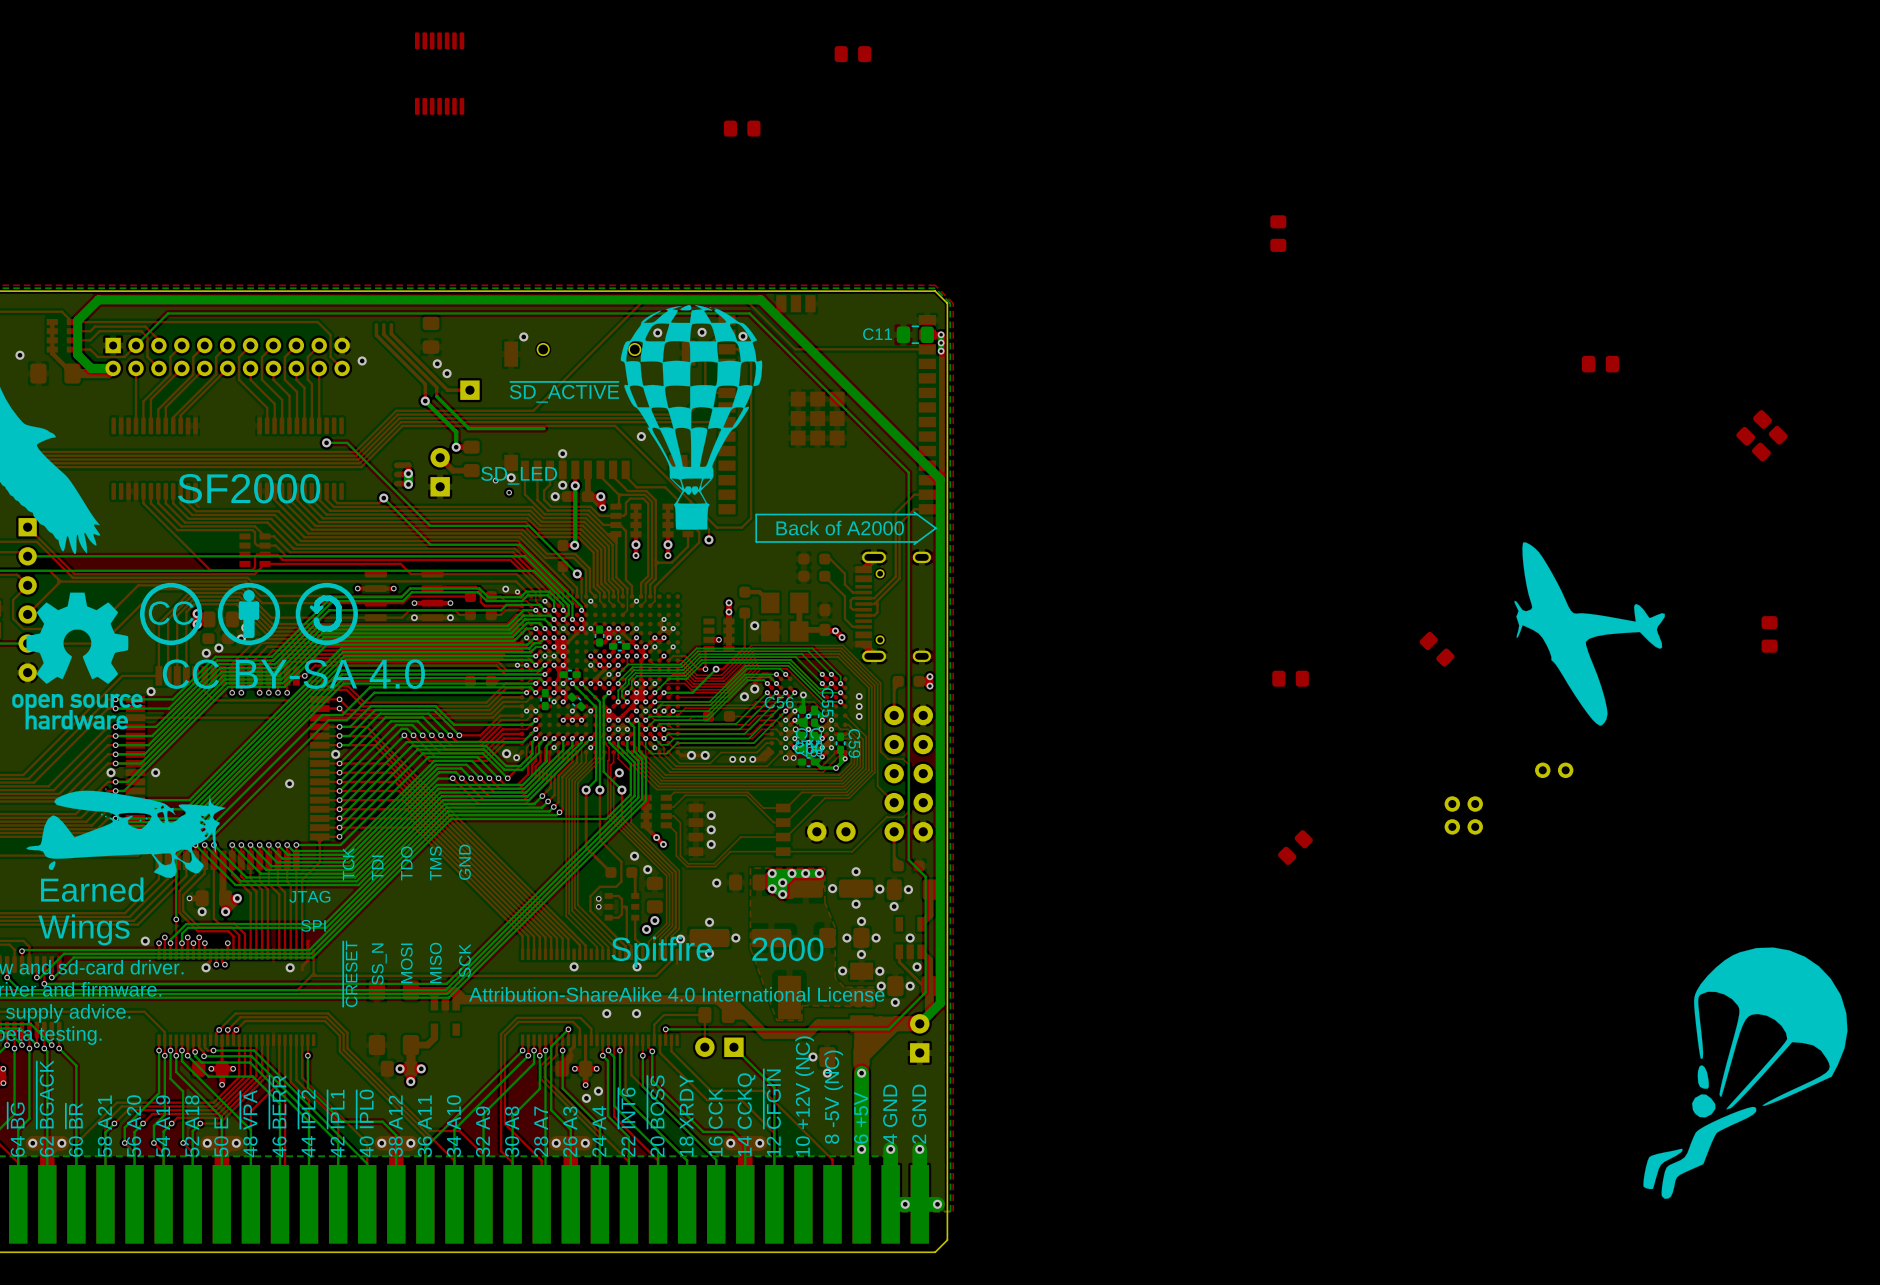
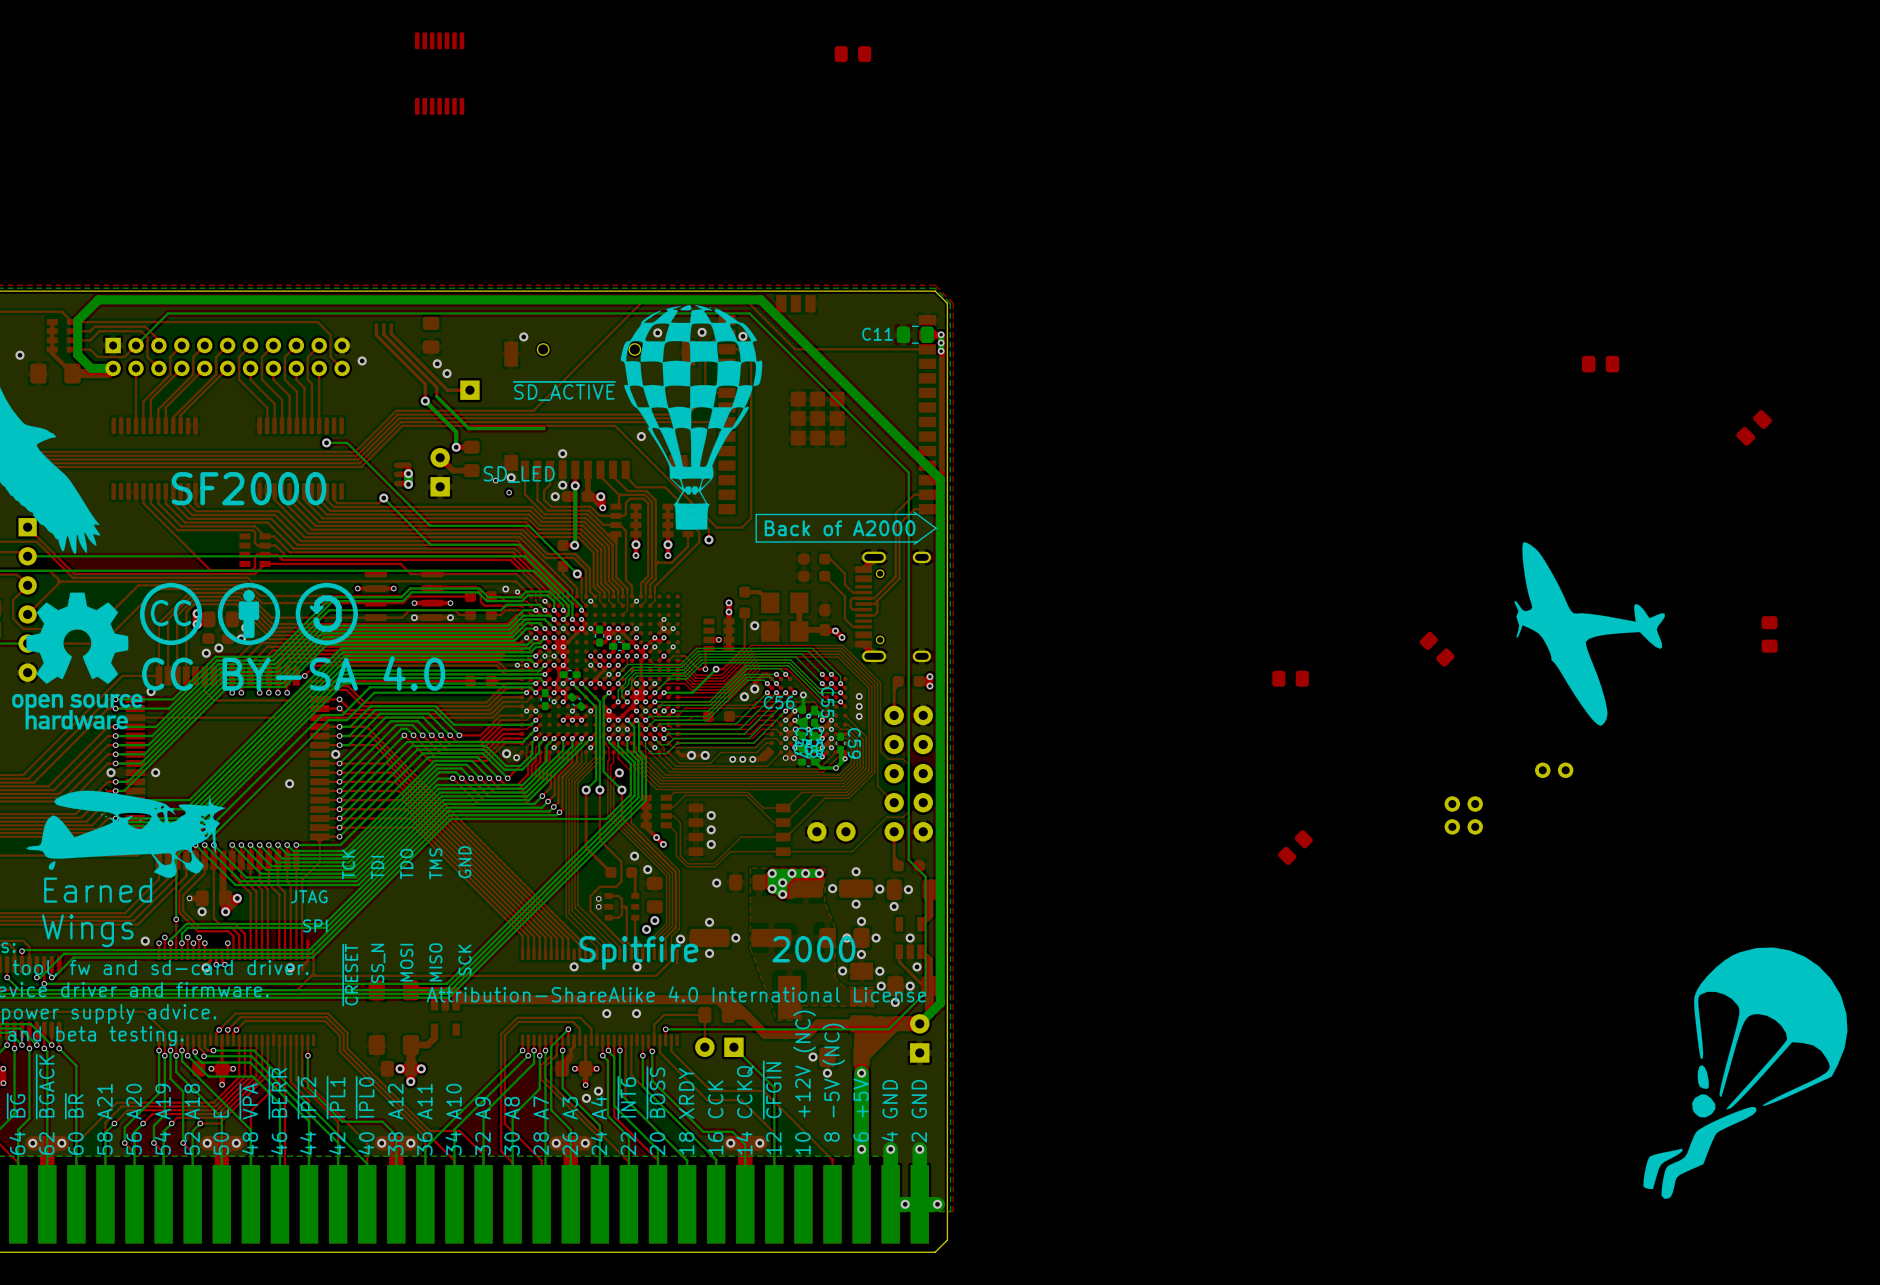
part: (742, 128) -> none
part: (1278, 233) -> none
part: (1769, 443) -> none

